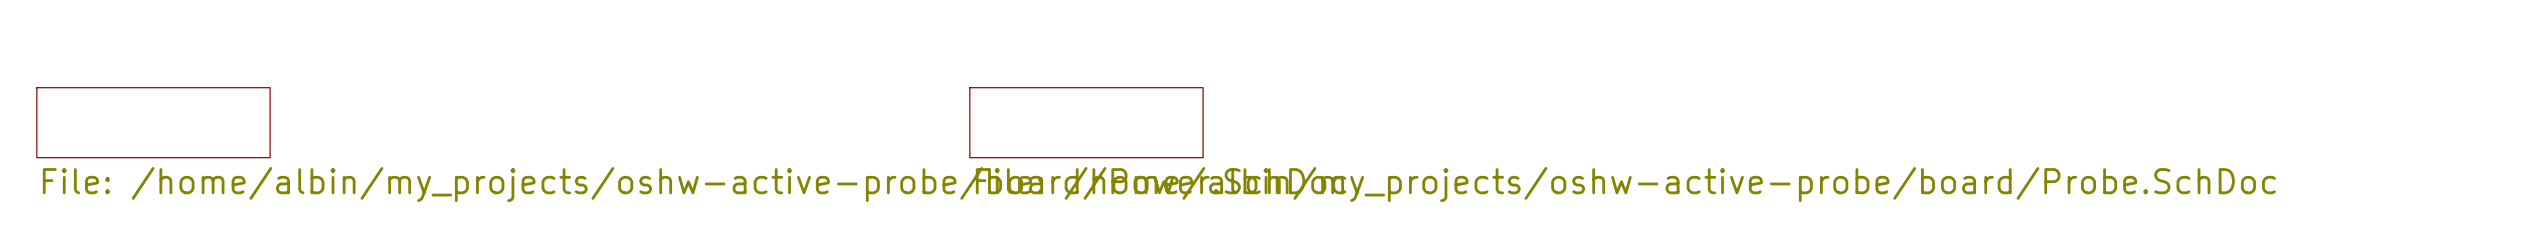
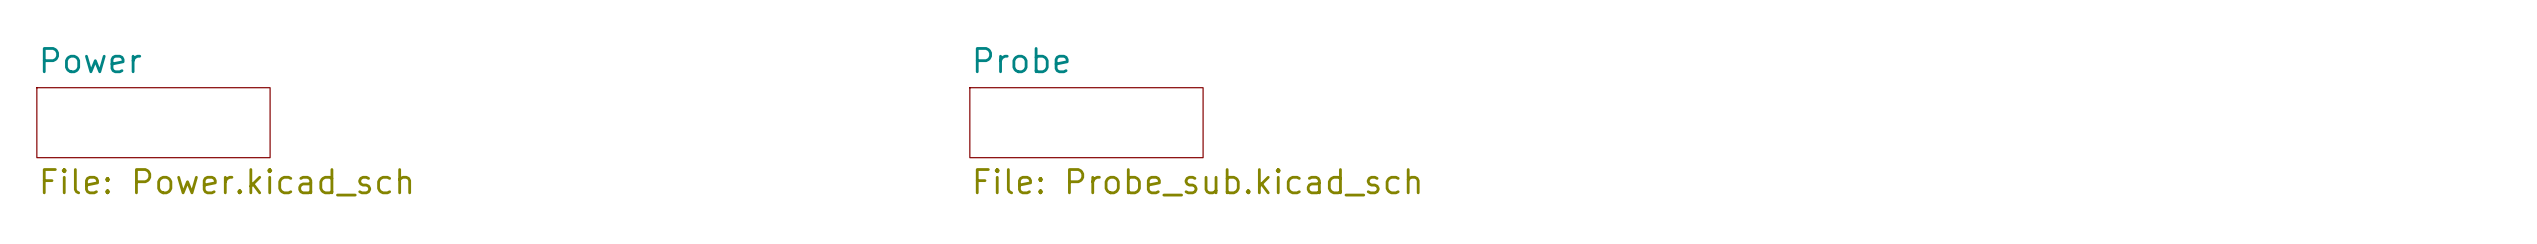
sheet Power name: none -> Power (92, 60)
sheet Probe name: none -> Probe (1022, 60)
sheet Power value: File: /home/albin/my_projects/oshw-active-probe/board/Power.SchDoc (694, 184) -> File: Power.kicad_sch (226, 182)
sheet Probe value: File: /home/albin/my_projects/oshw-active-probe/board/Probe.SchDoc (1625, 184) -> File: Probe_sub.kicad_sch (1197, 182)

